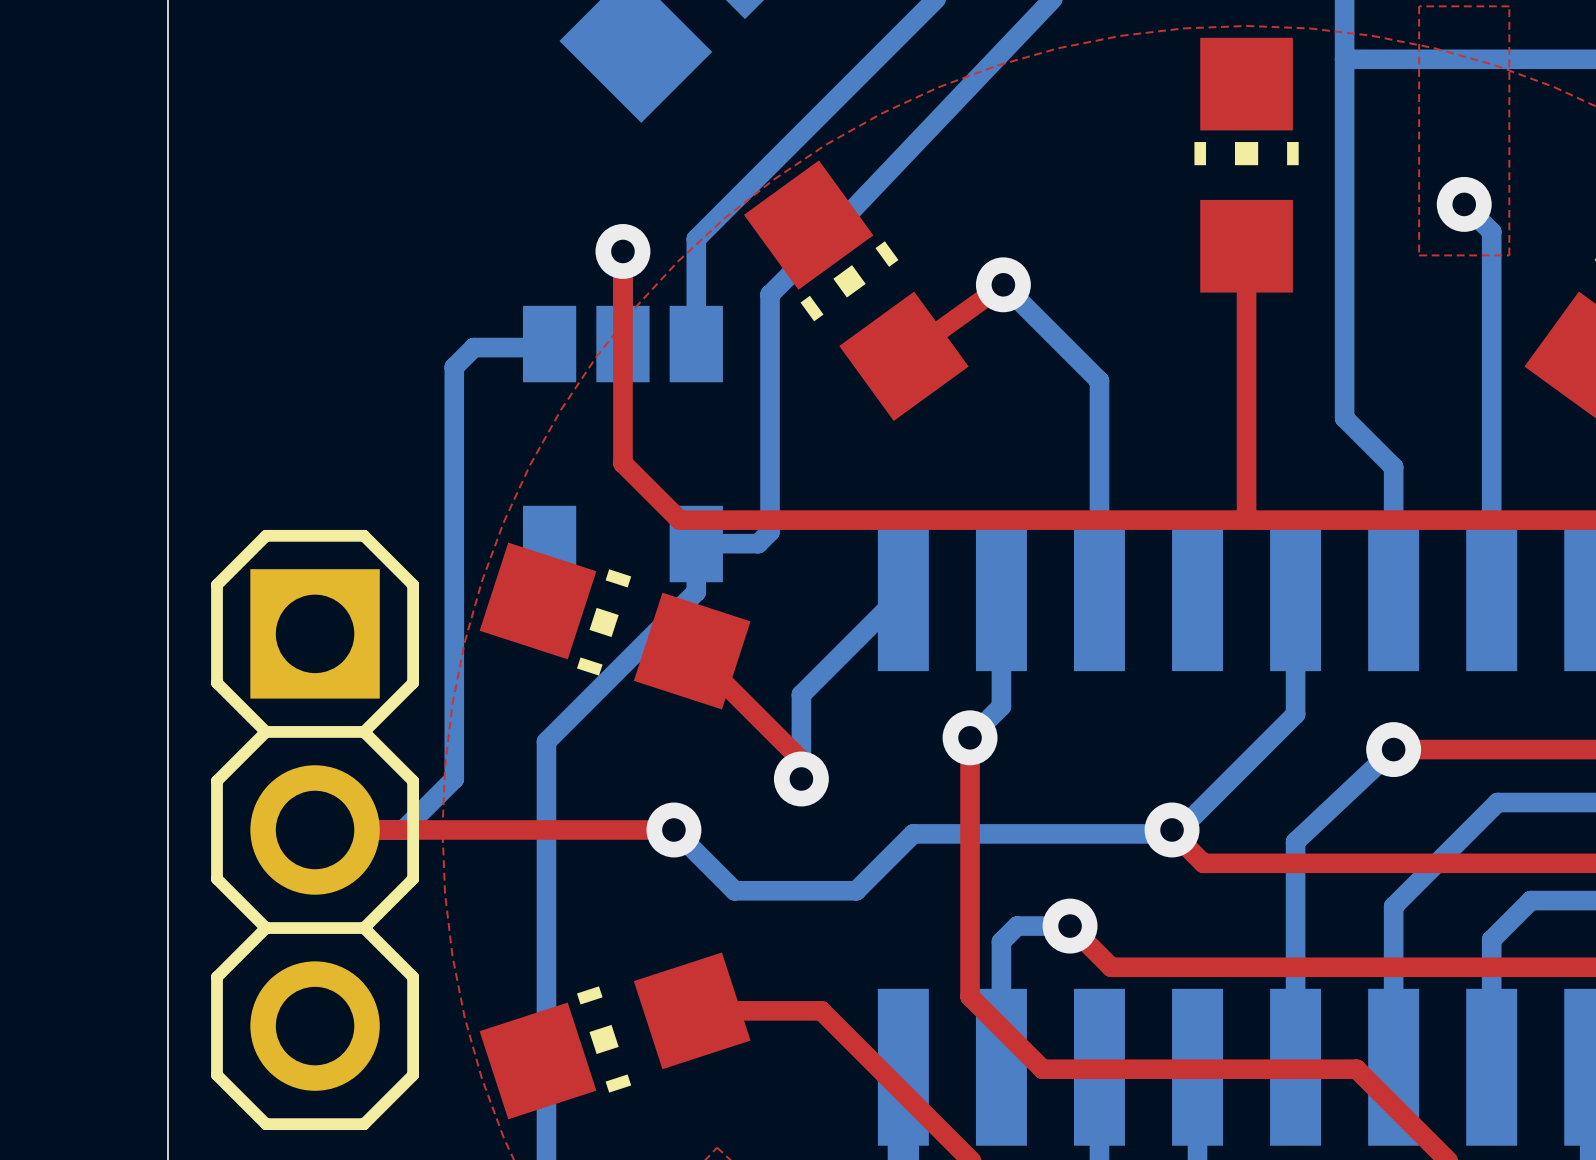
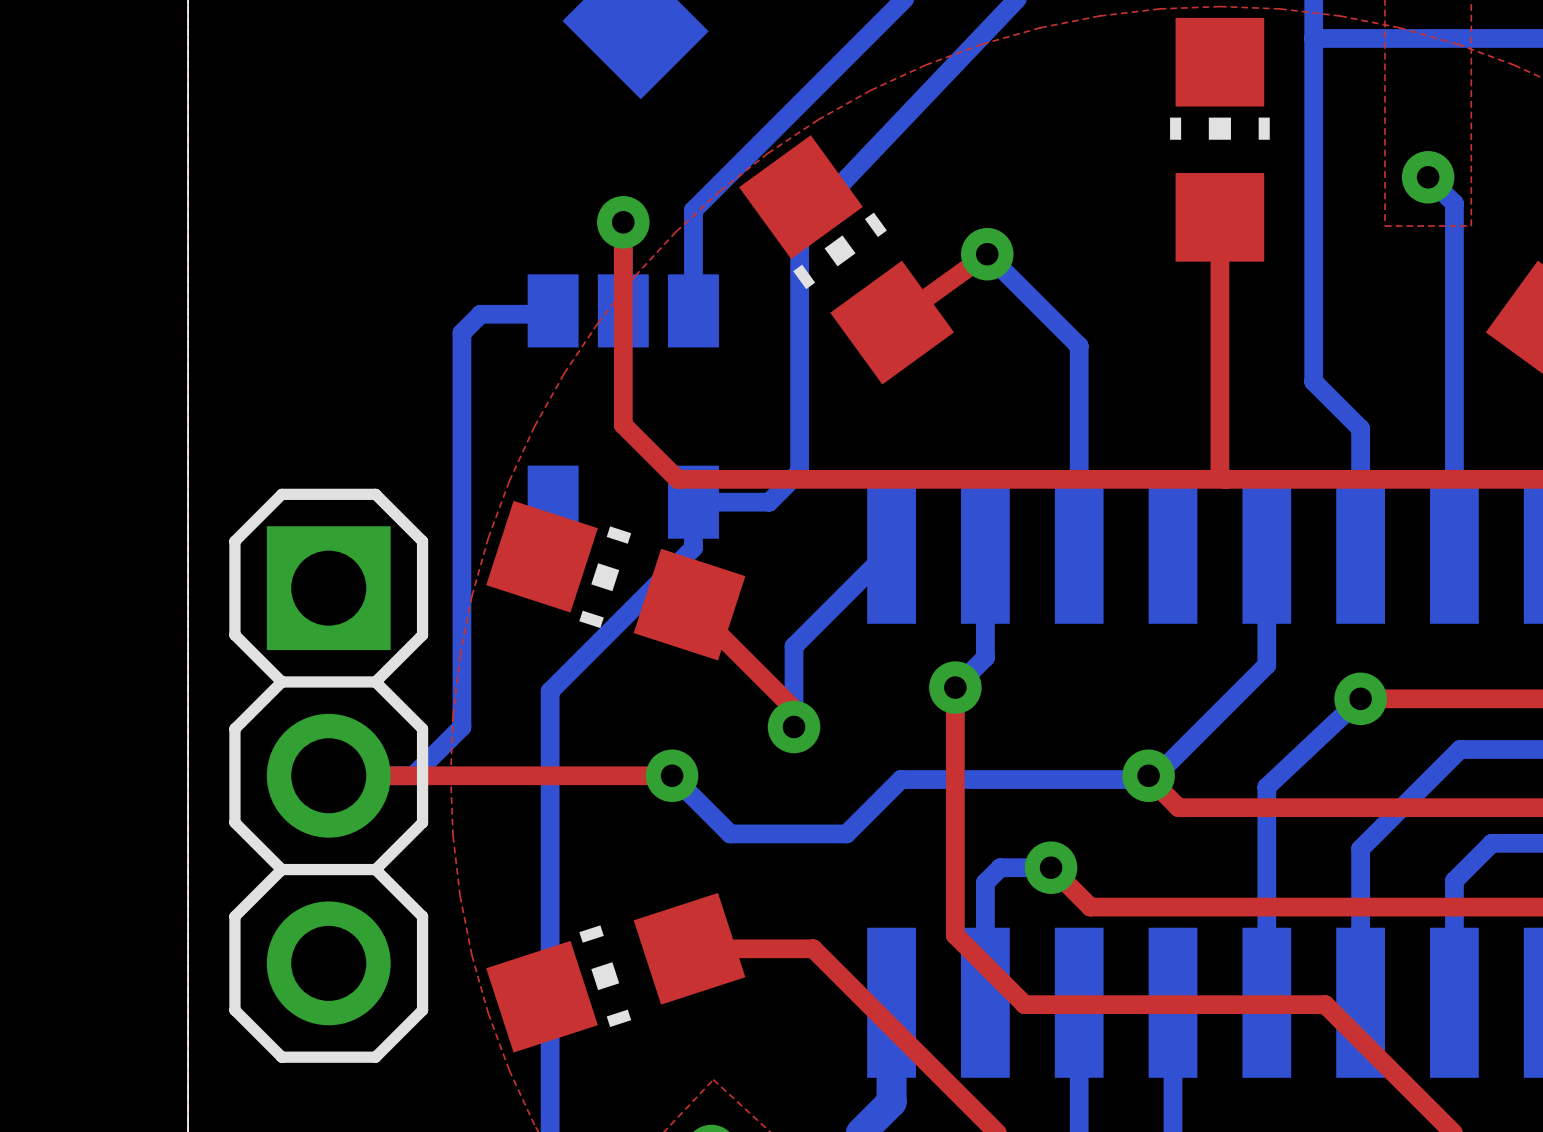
bottom track: (807, 257) (770, 294) (770, 531) (758, 543) (696, 543) -> (799, 227) (799, 471) (769, 502) (693, 502)

